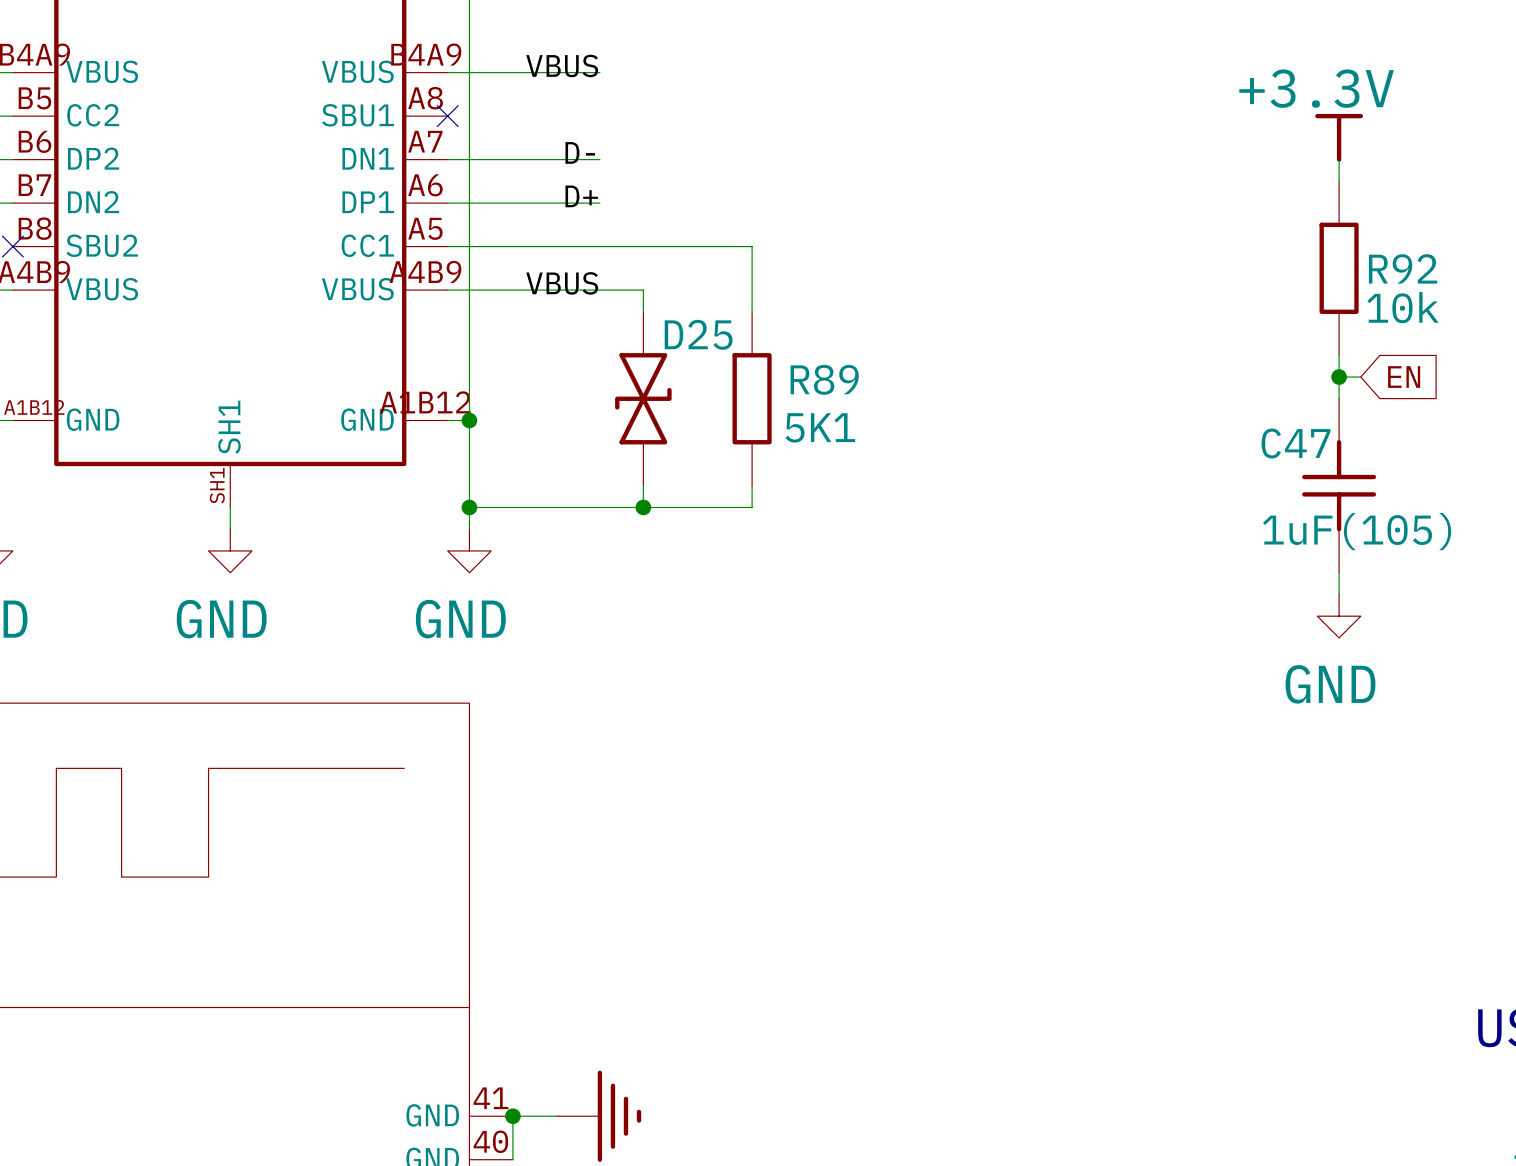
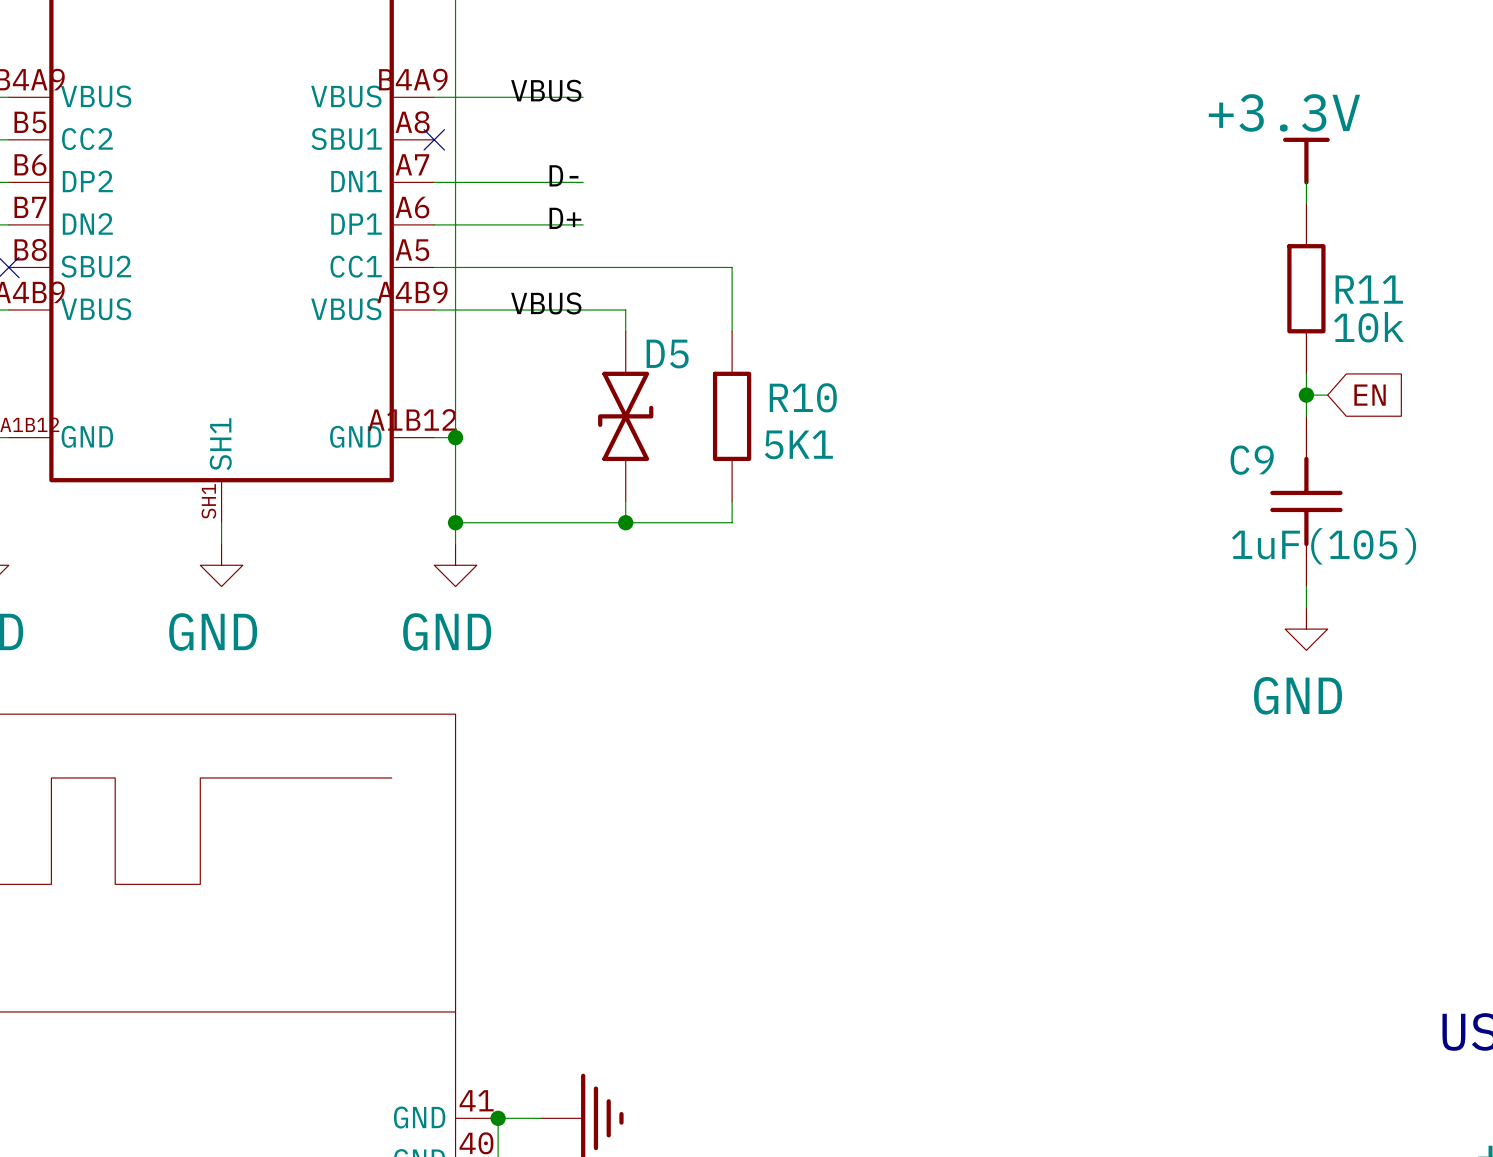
R92 name: R92 (1403, 268) -> R11 (1369, 289)
D25 name: D25 (698, 334) -> D5 (667, 354)
R89 name: R89 (824, 379) -> R10 (803, 397)
C47 name: C47 (1295, 443) -> C9 (1252, 460)

